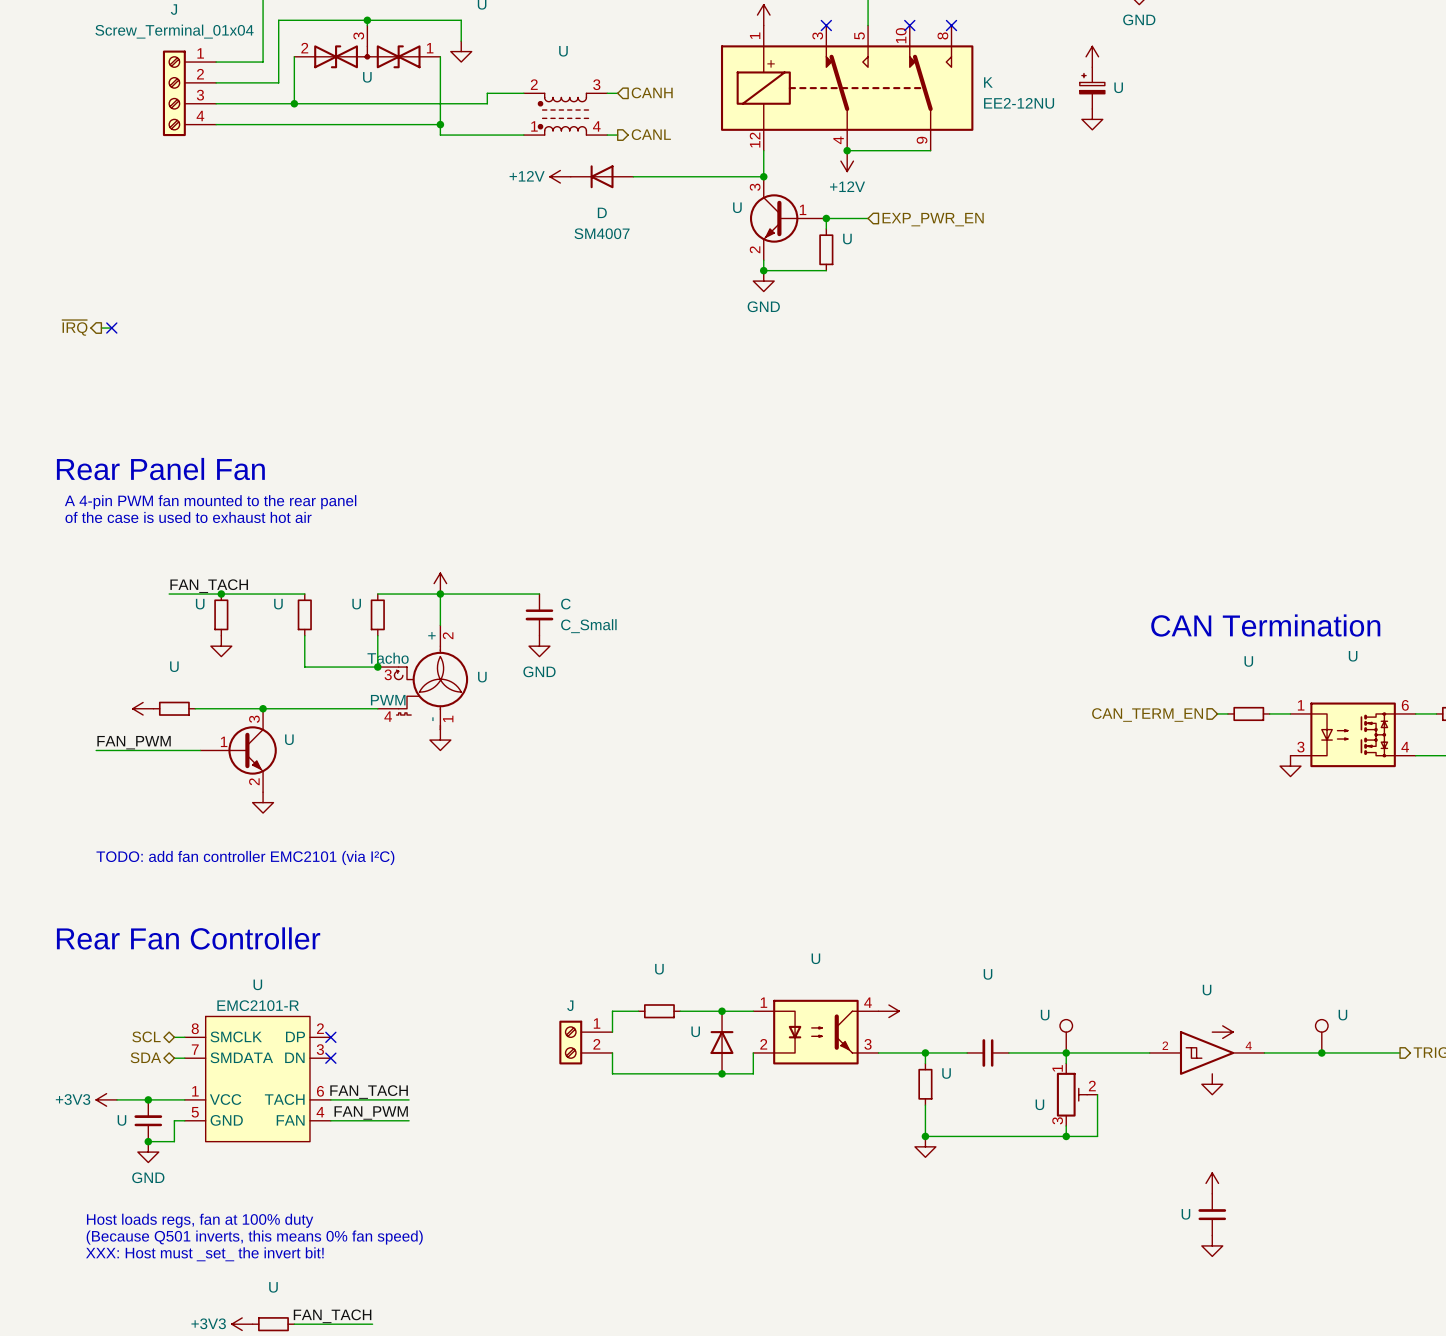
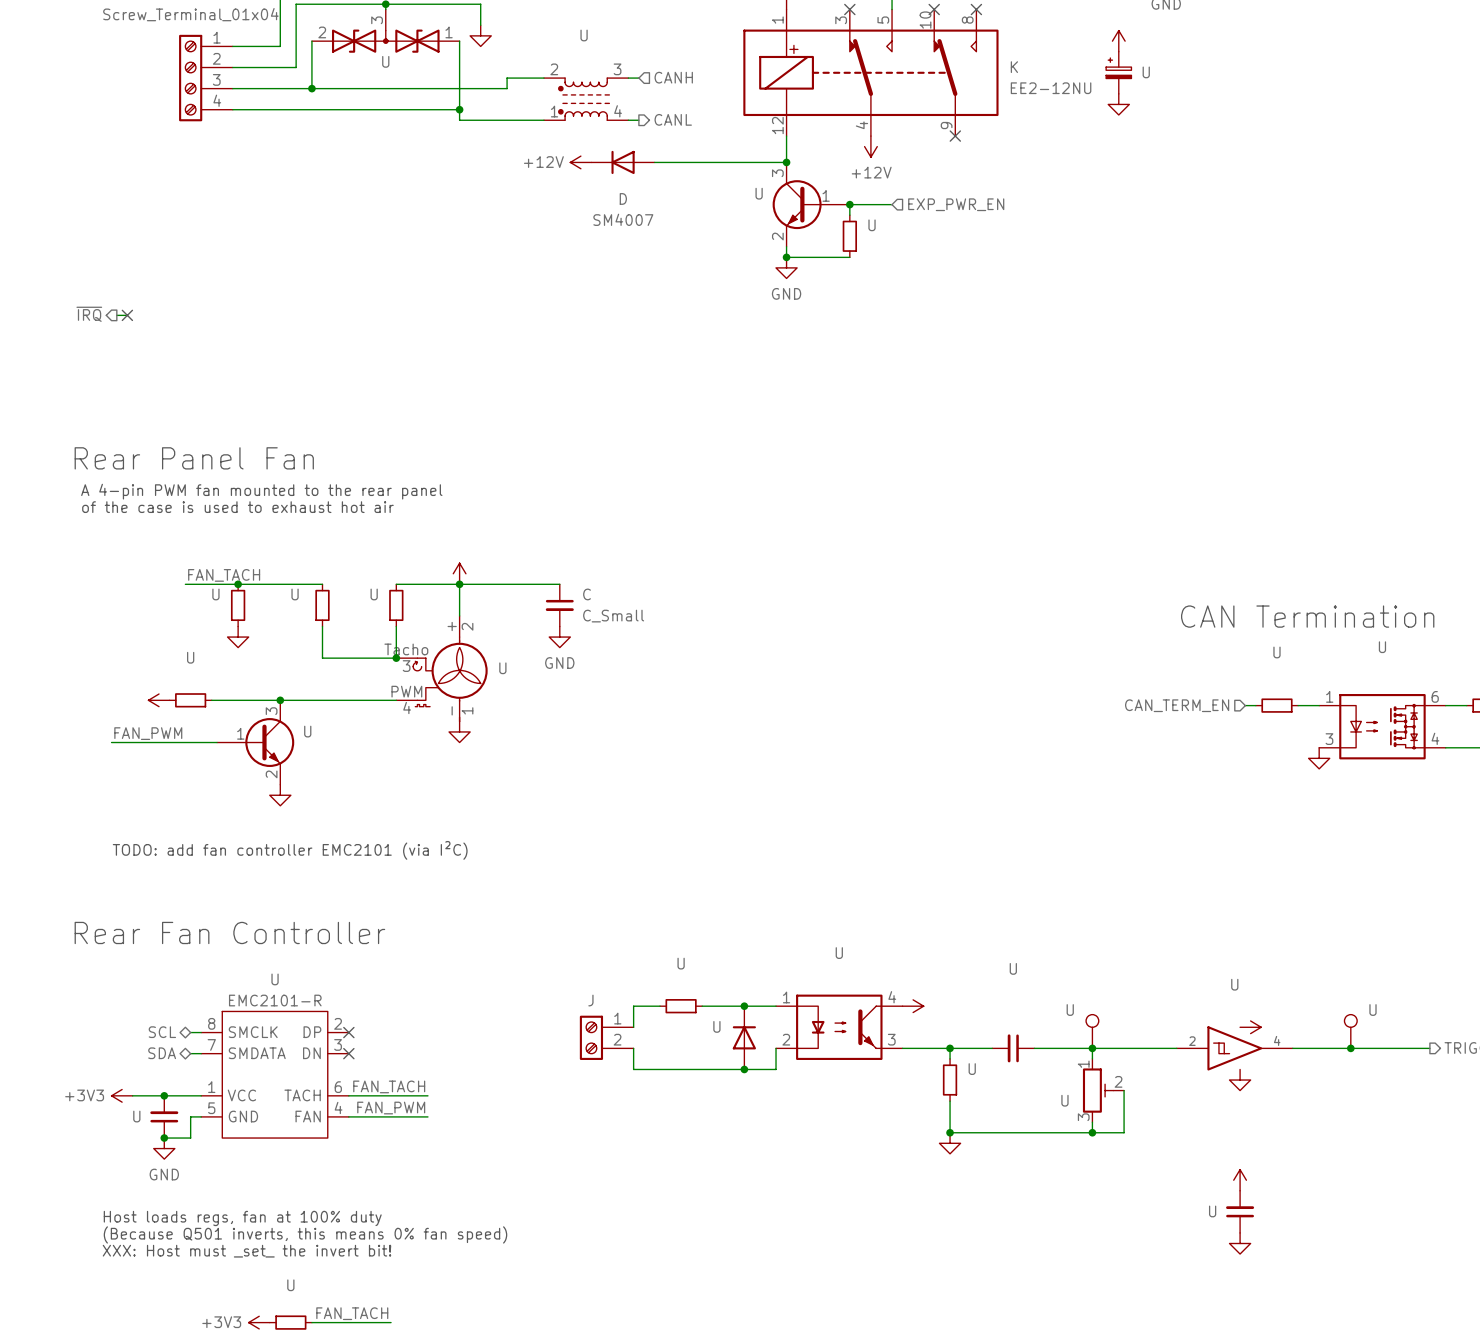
wire: (847, 150) (930, 150) -> none
junction: (847, 150) -> none
no-connect mark: none -> (955, 136)

